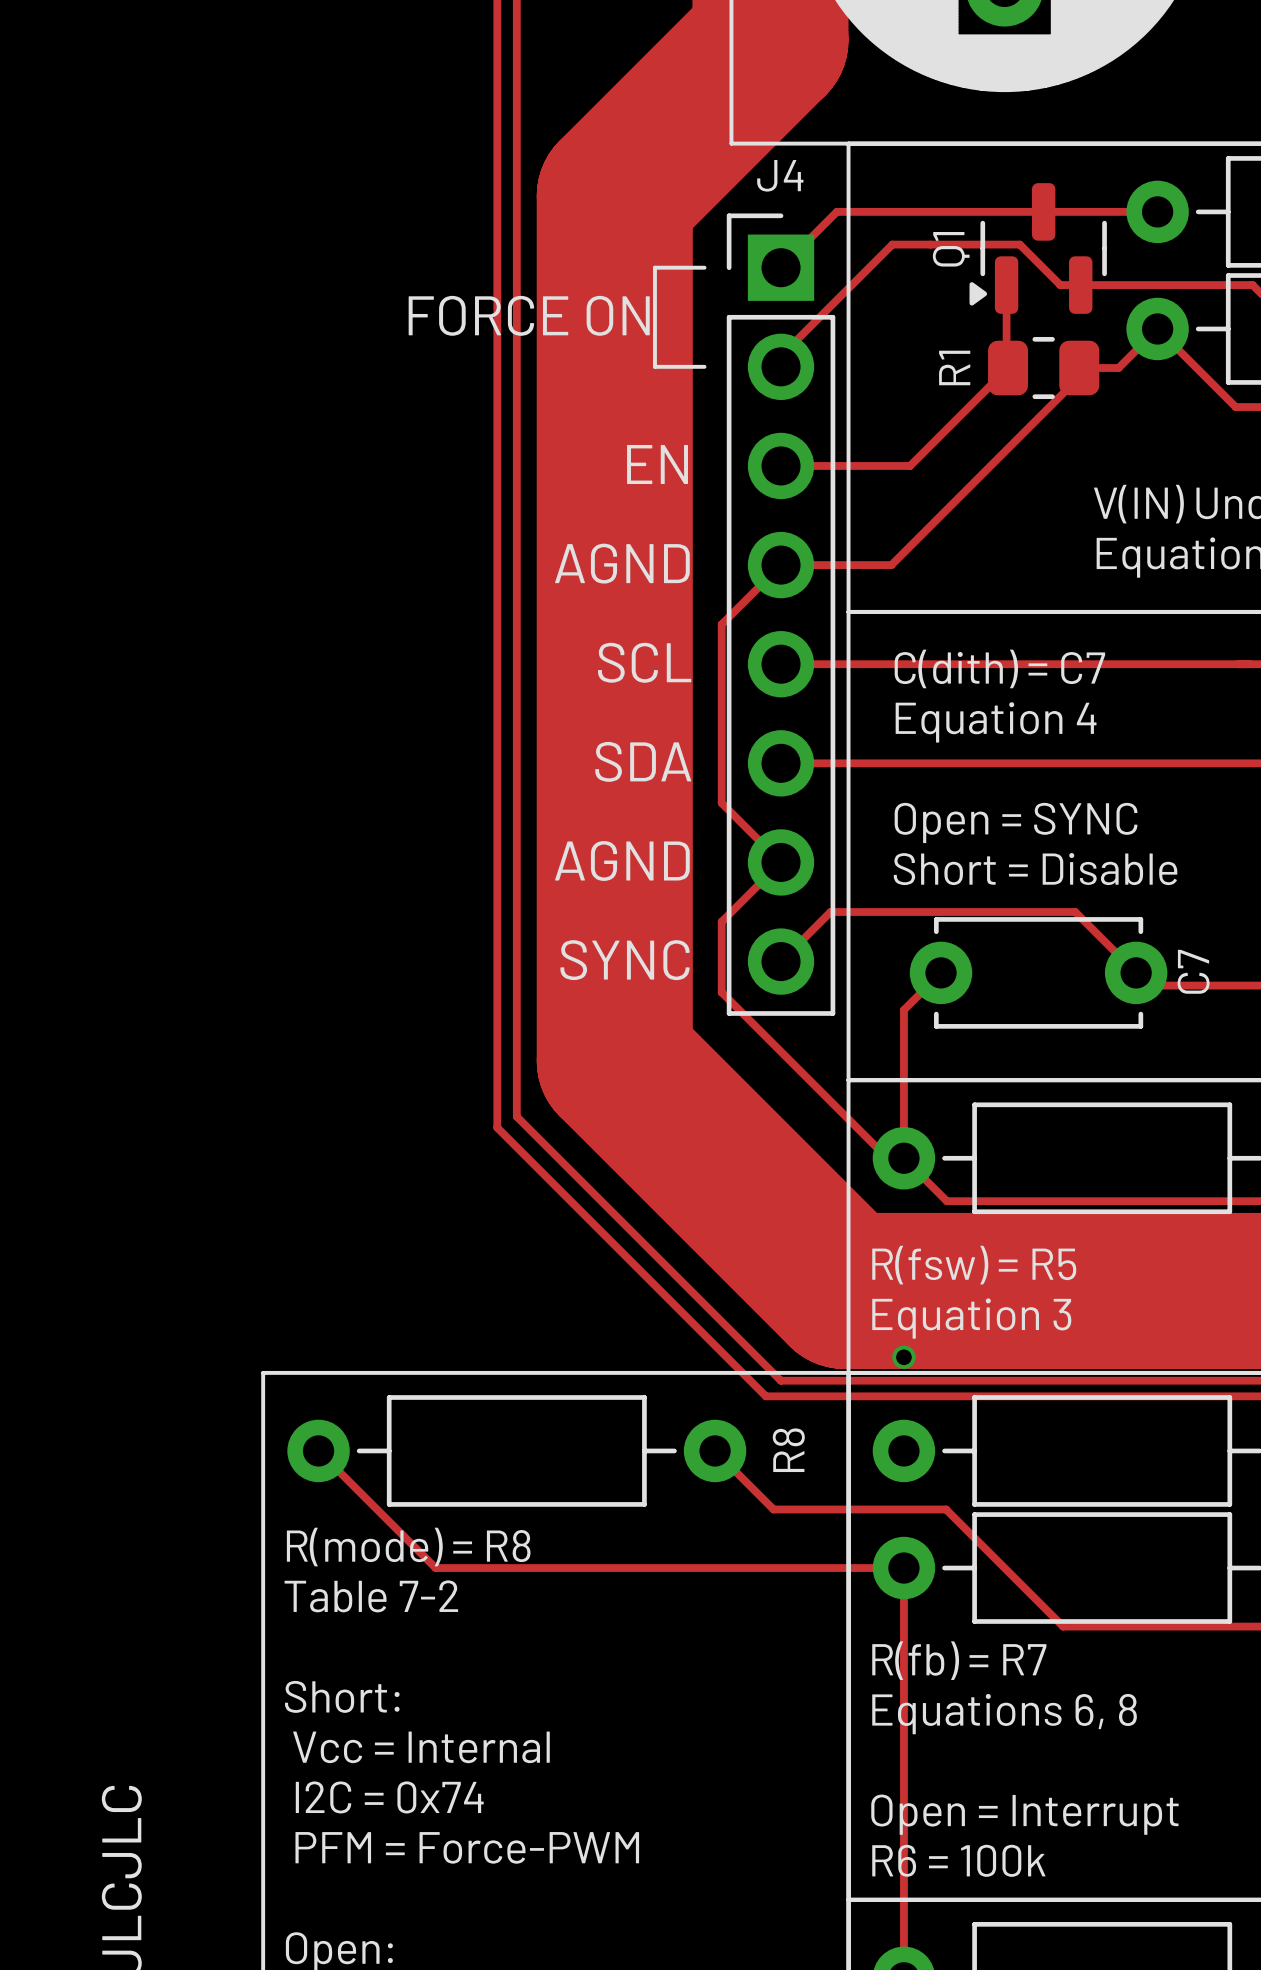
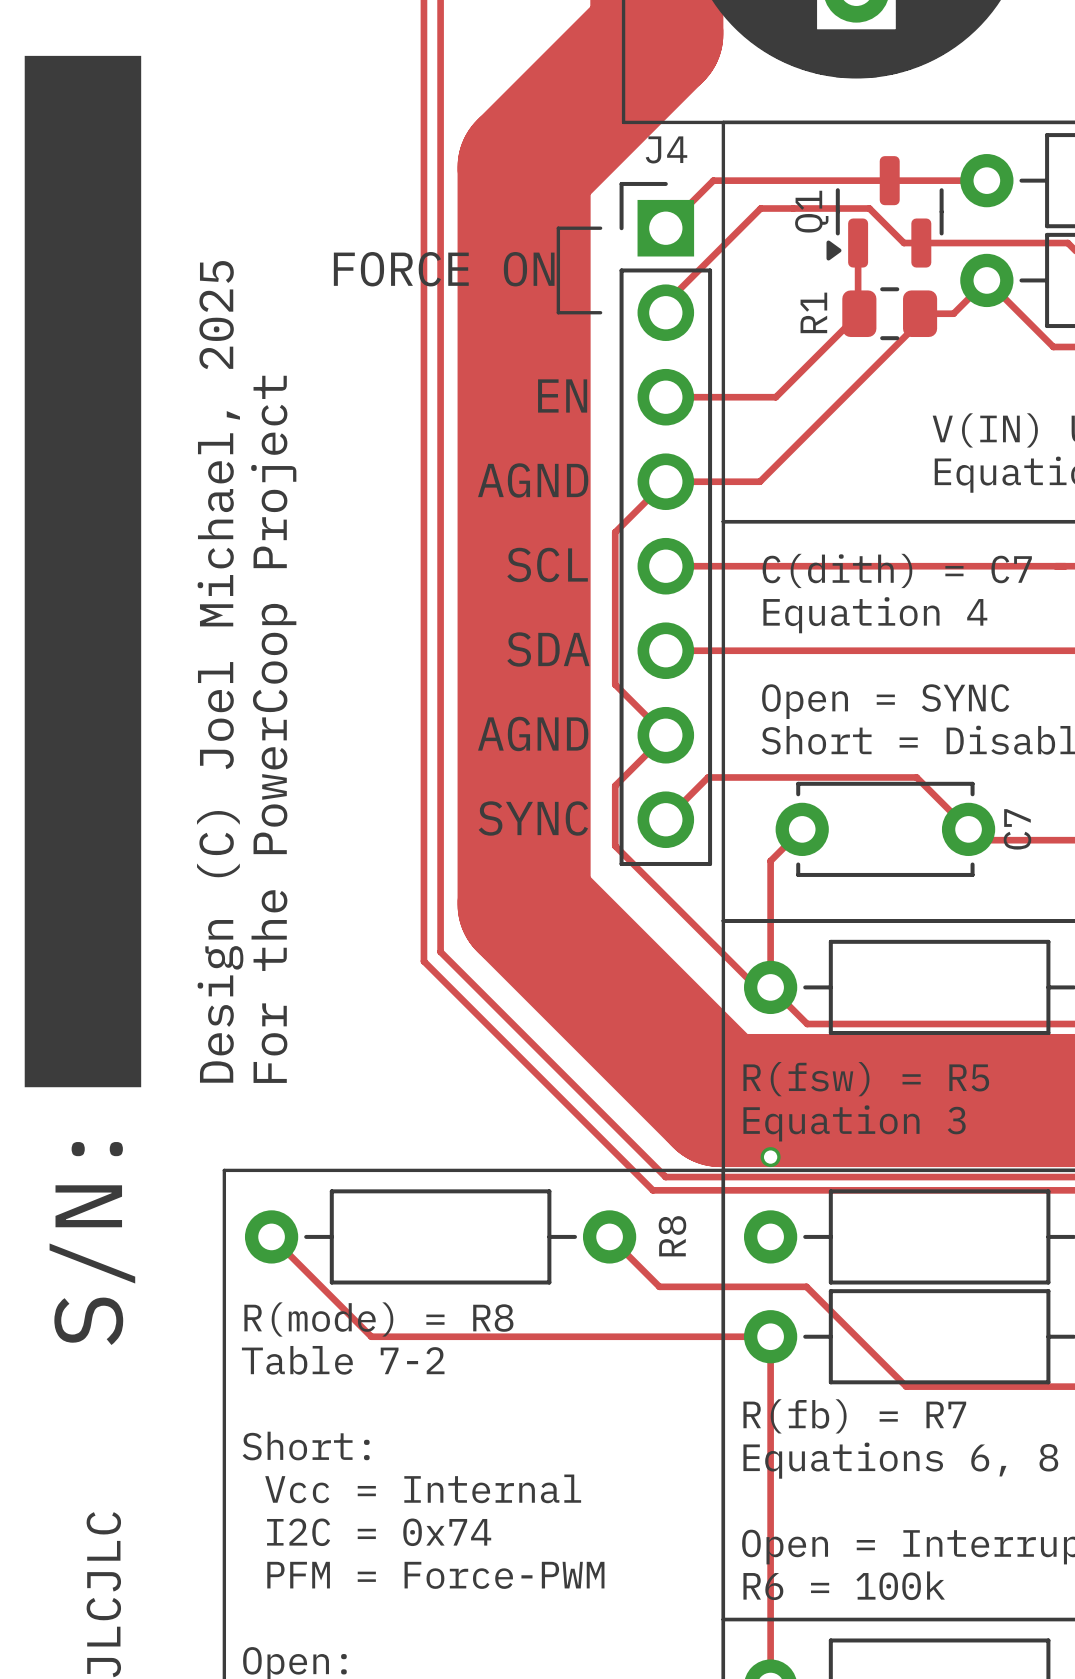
drawing: none -> [24, 55, 142, 1088]
text: none -> Design (C) Joel Michael, 2025 (220, 671)
text: none -> For the PowerCoop Project (273, 729)
text: none -> S/N: (92, 1243)

